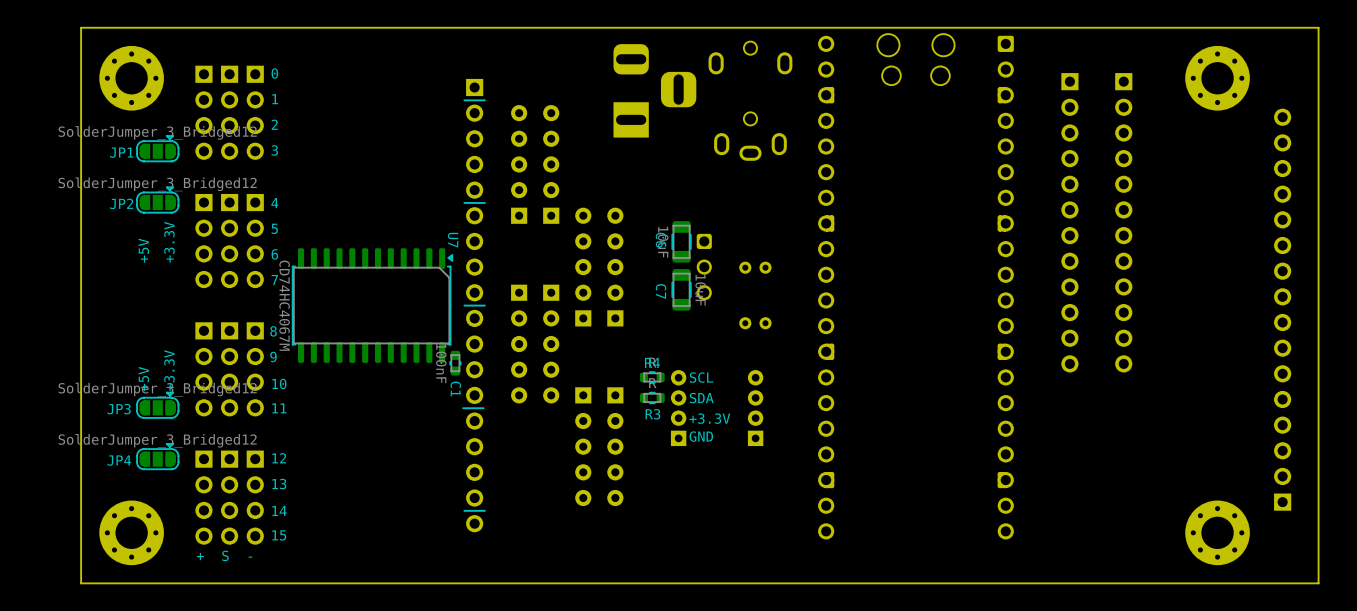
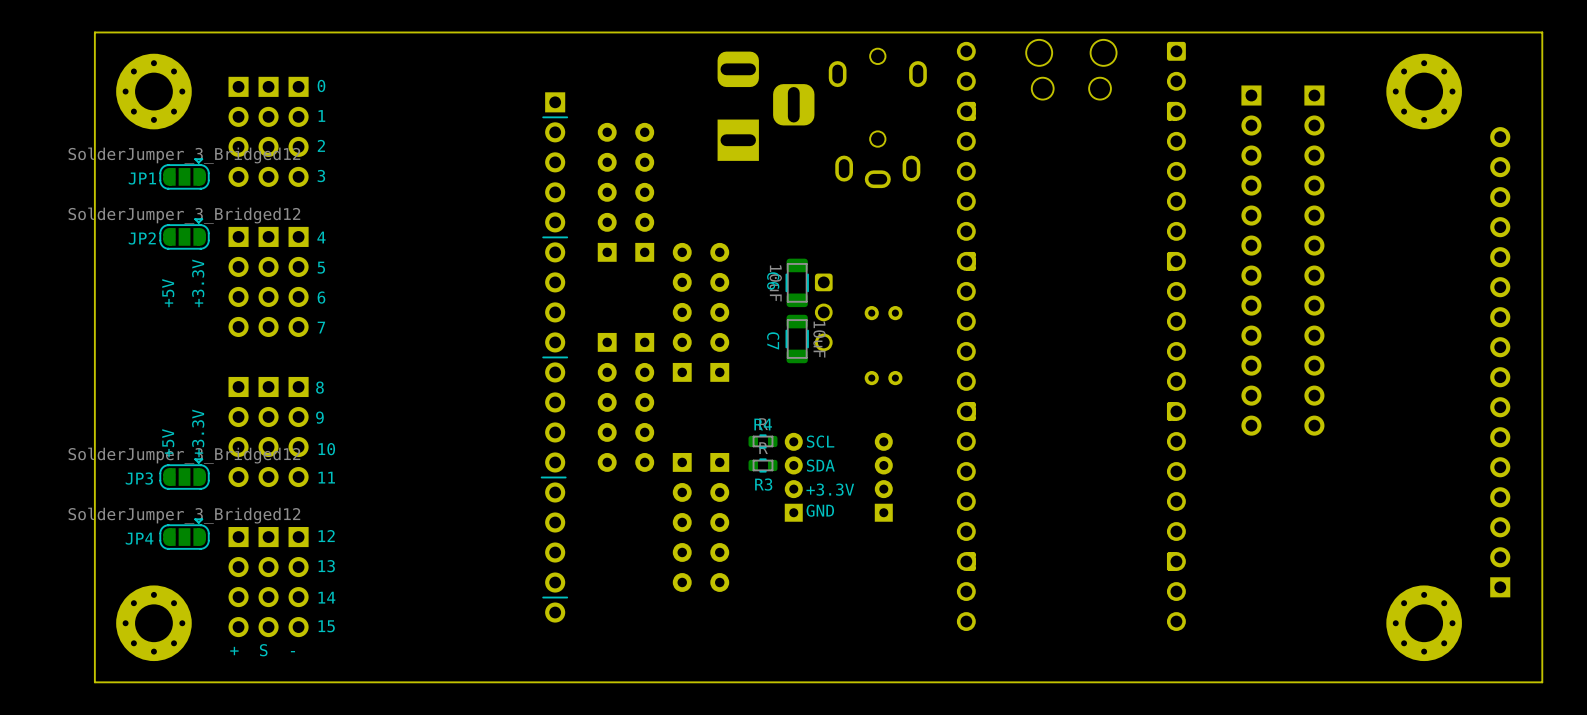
U7: CD74HC4067M (372, 305) -> none
C1: 100nF (455, 363) -> none

